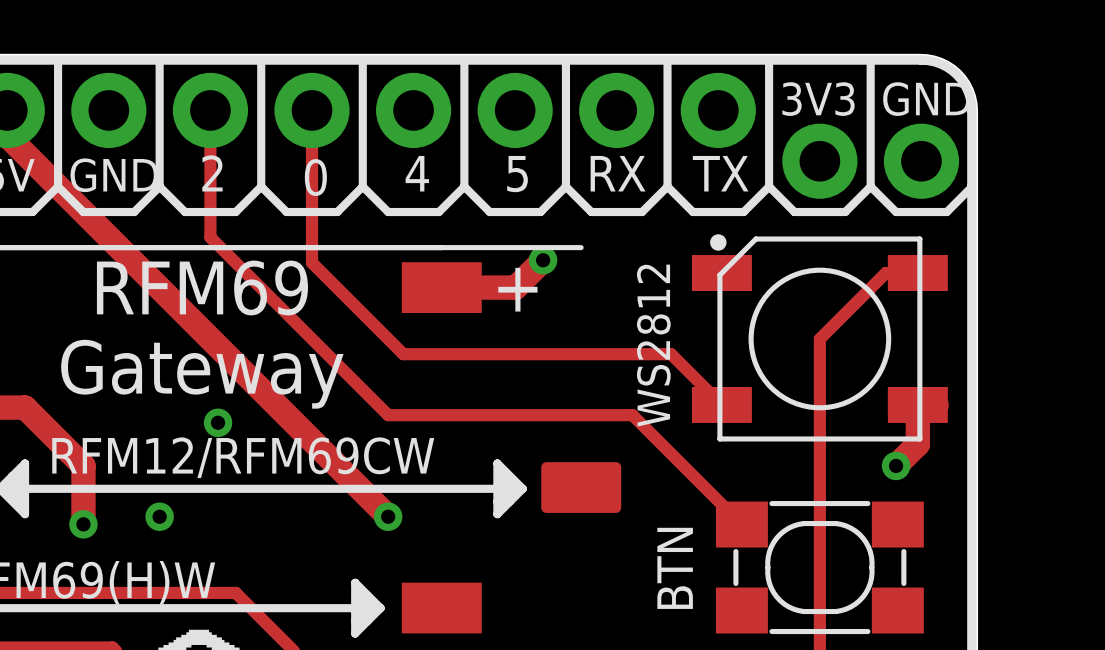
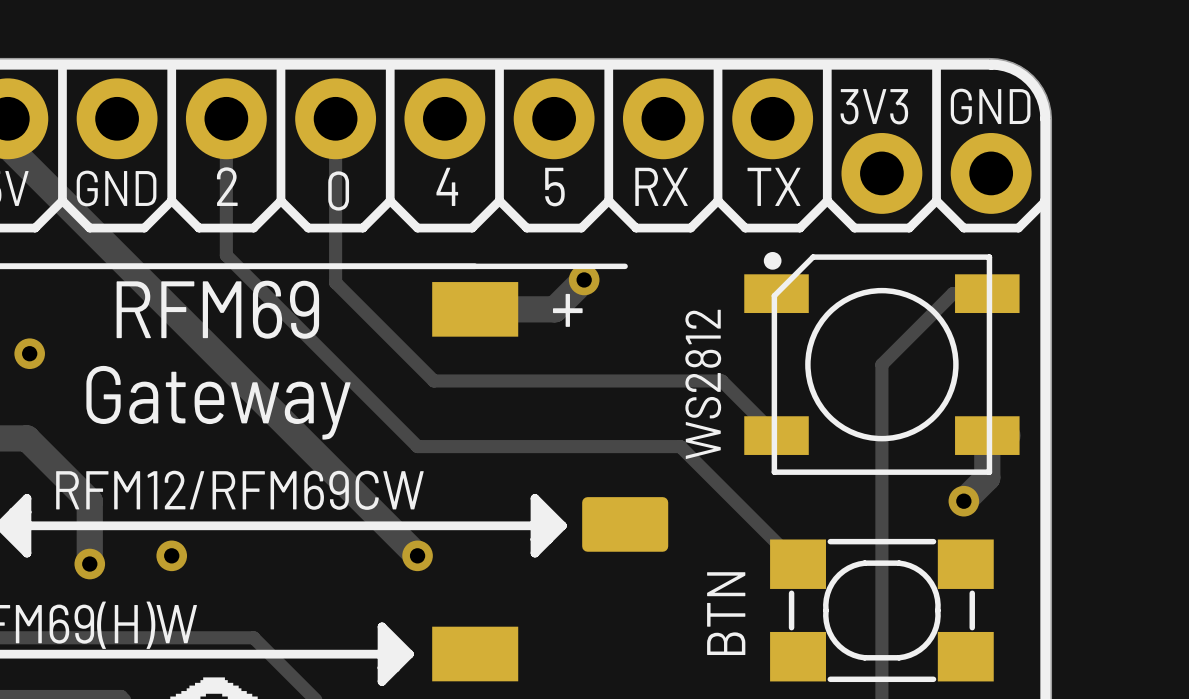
via: none -> (29, 353)
via: (218, 422) -> none

